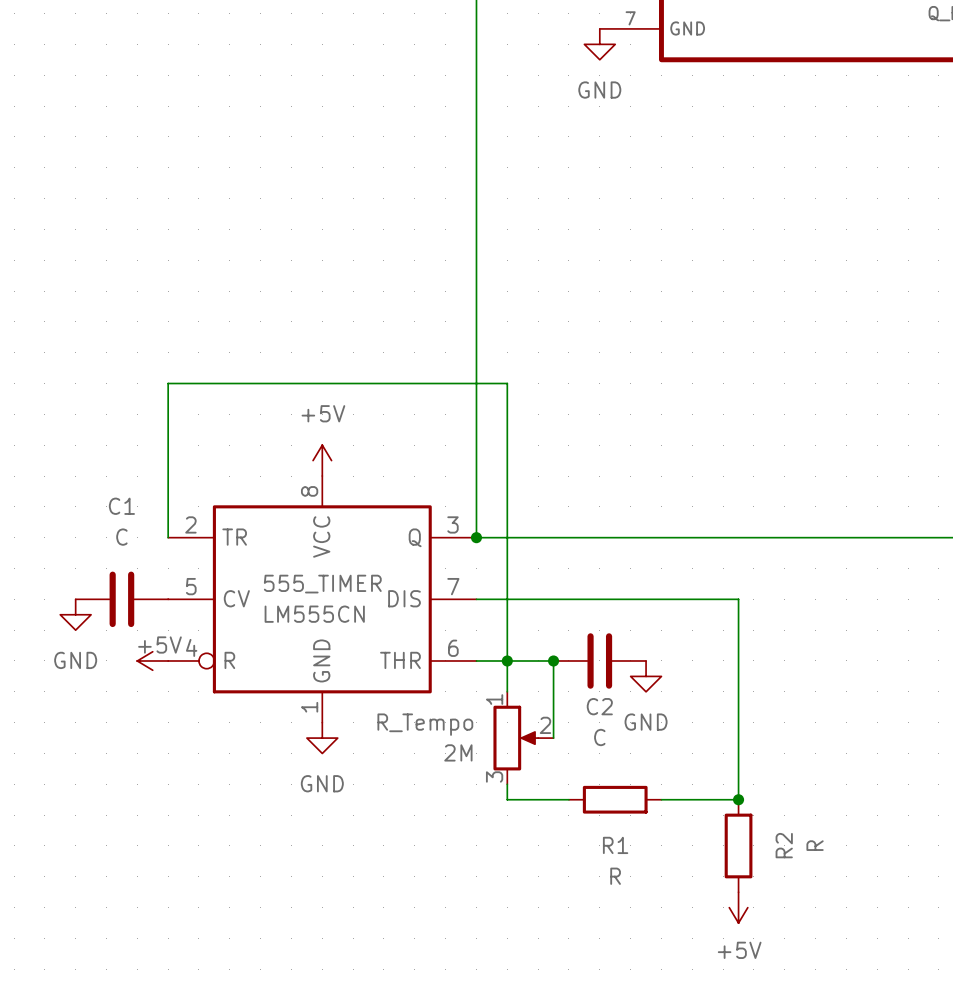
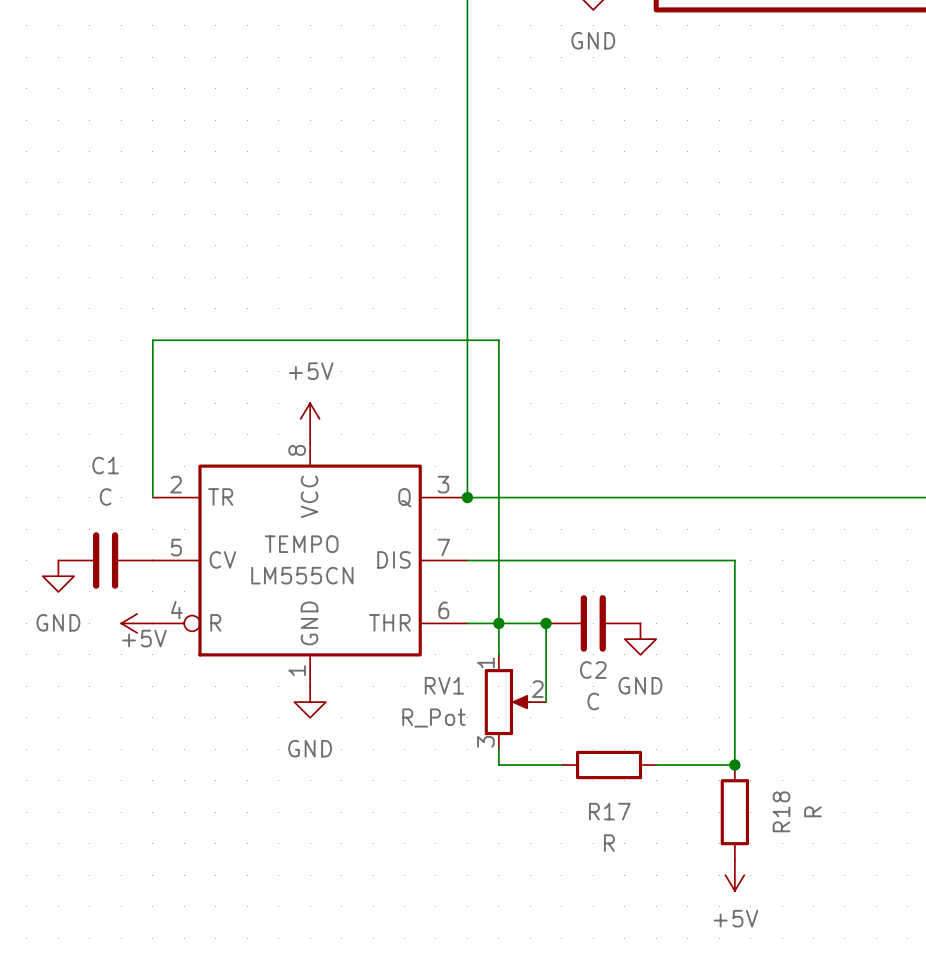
555_TIMER name: 555_TIMER (322, 584) -> TEMPO (301, 544)
power symbol text position: +5V (159, 645) -> +5V (144, 638)
R_Tempo name: R_Tempo (425, 724) -> RV1 (444, 685)
R_Tempo value: 2M (458, 752) -> R_Pot (433, 717)
R1 name: R1 (615, 845) -> R17 (609, 811)
R2 name: R2 (784, 845) -> R18 (781, 811)

